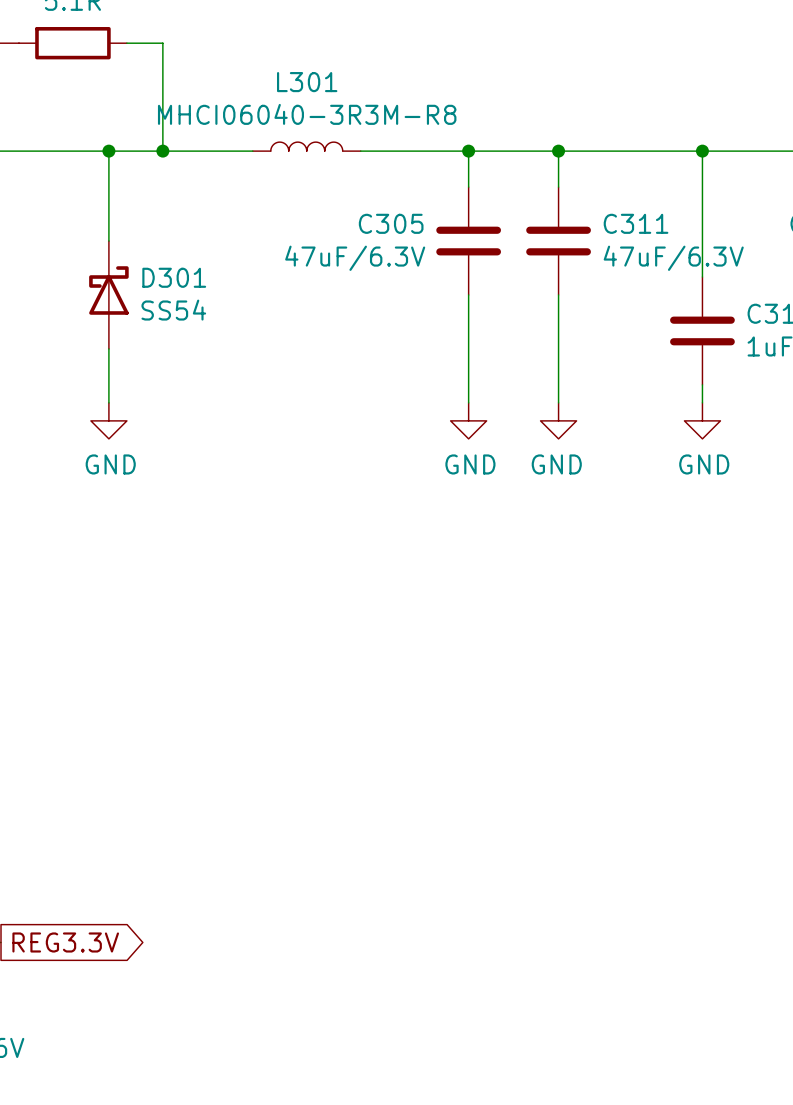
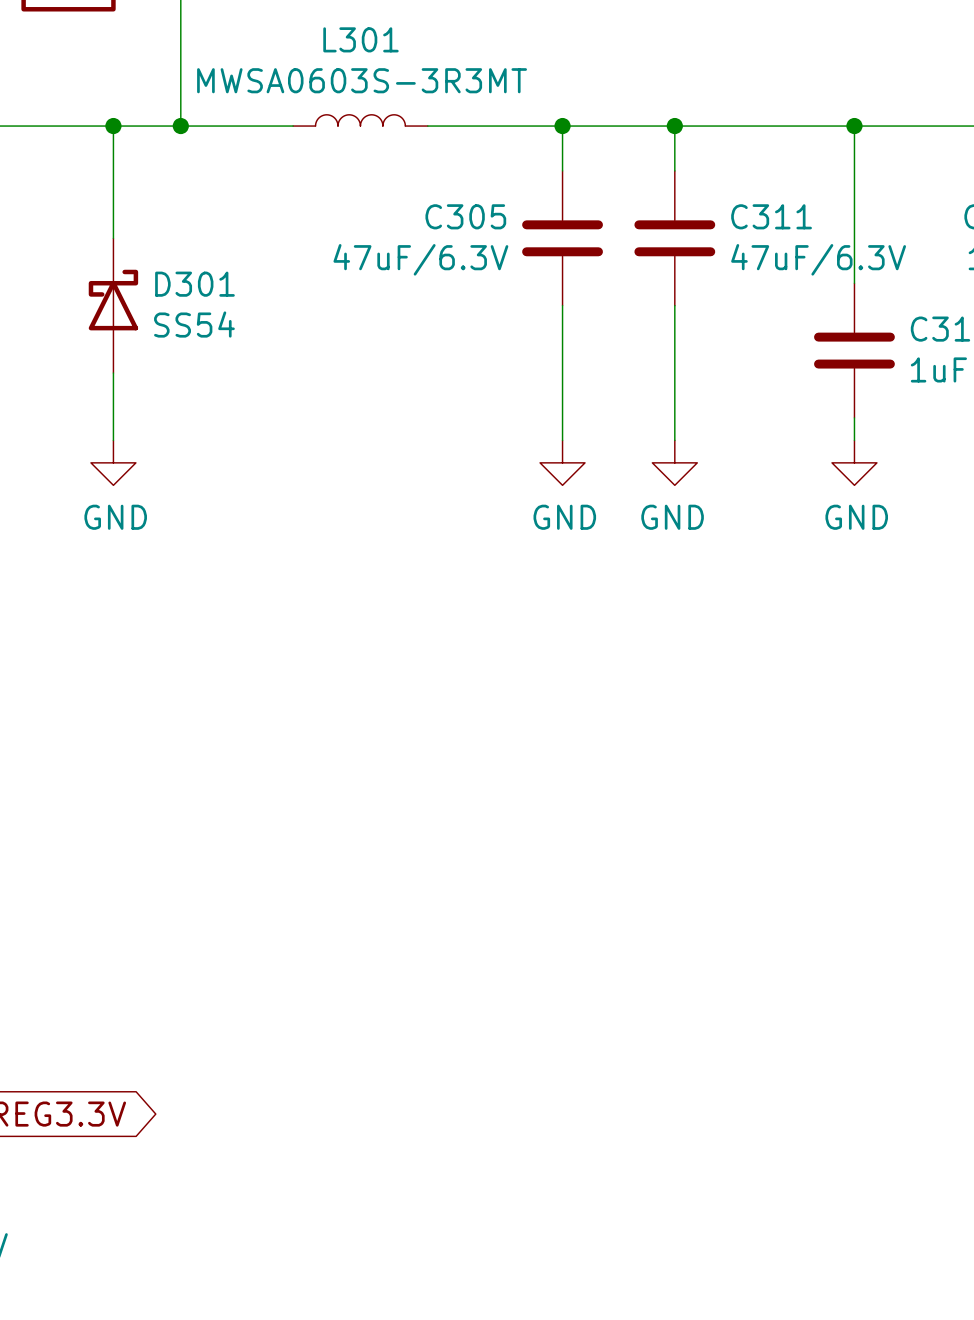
L301 value: MHCI06040-3R3M-R8 (307, 114) -> MWSA0603S-3R3MT (362, 80)

